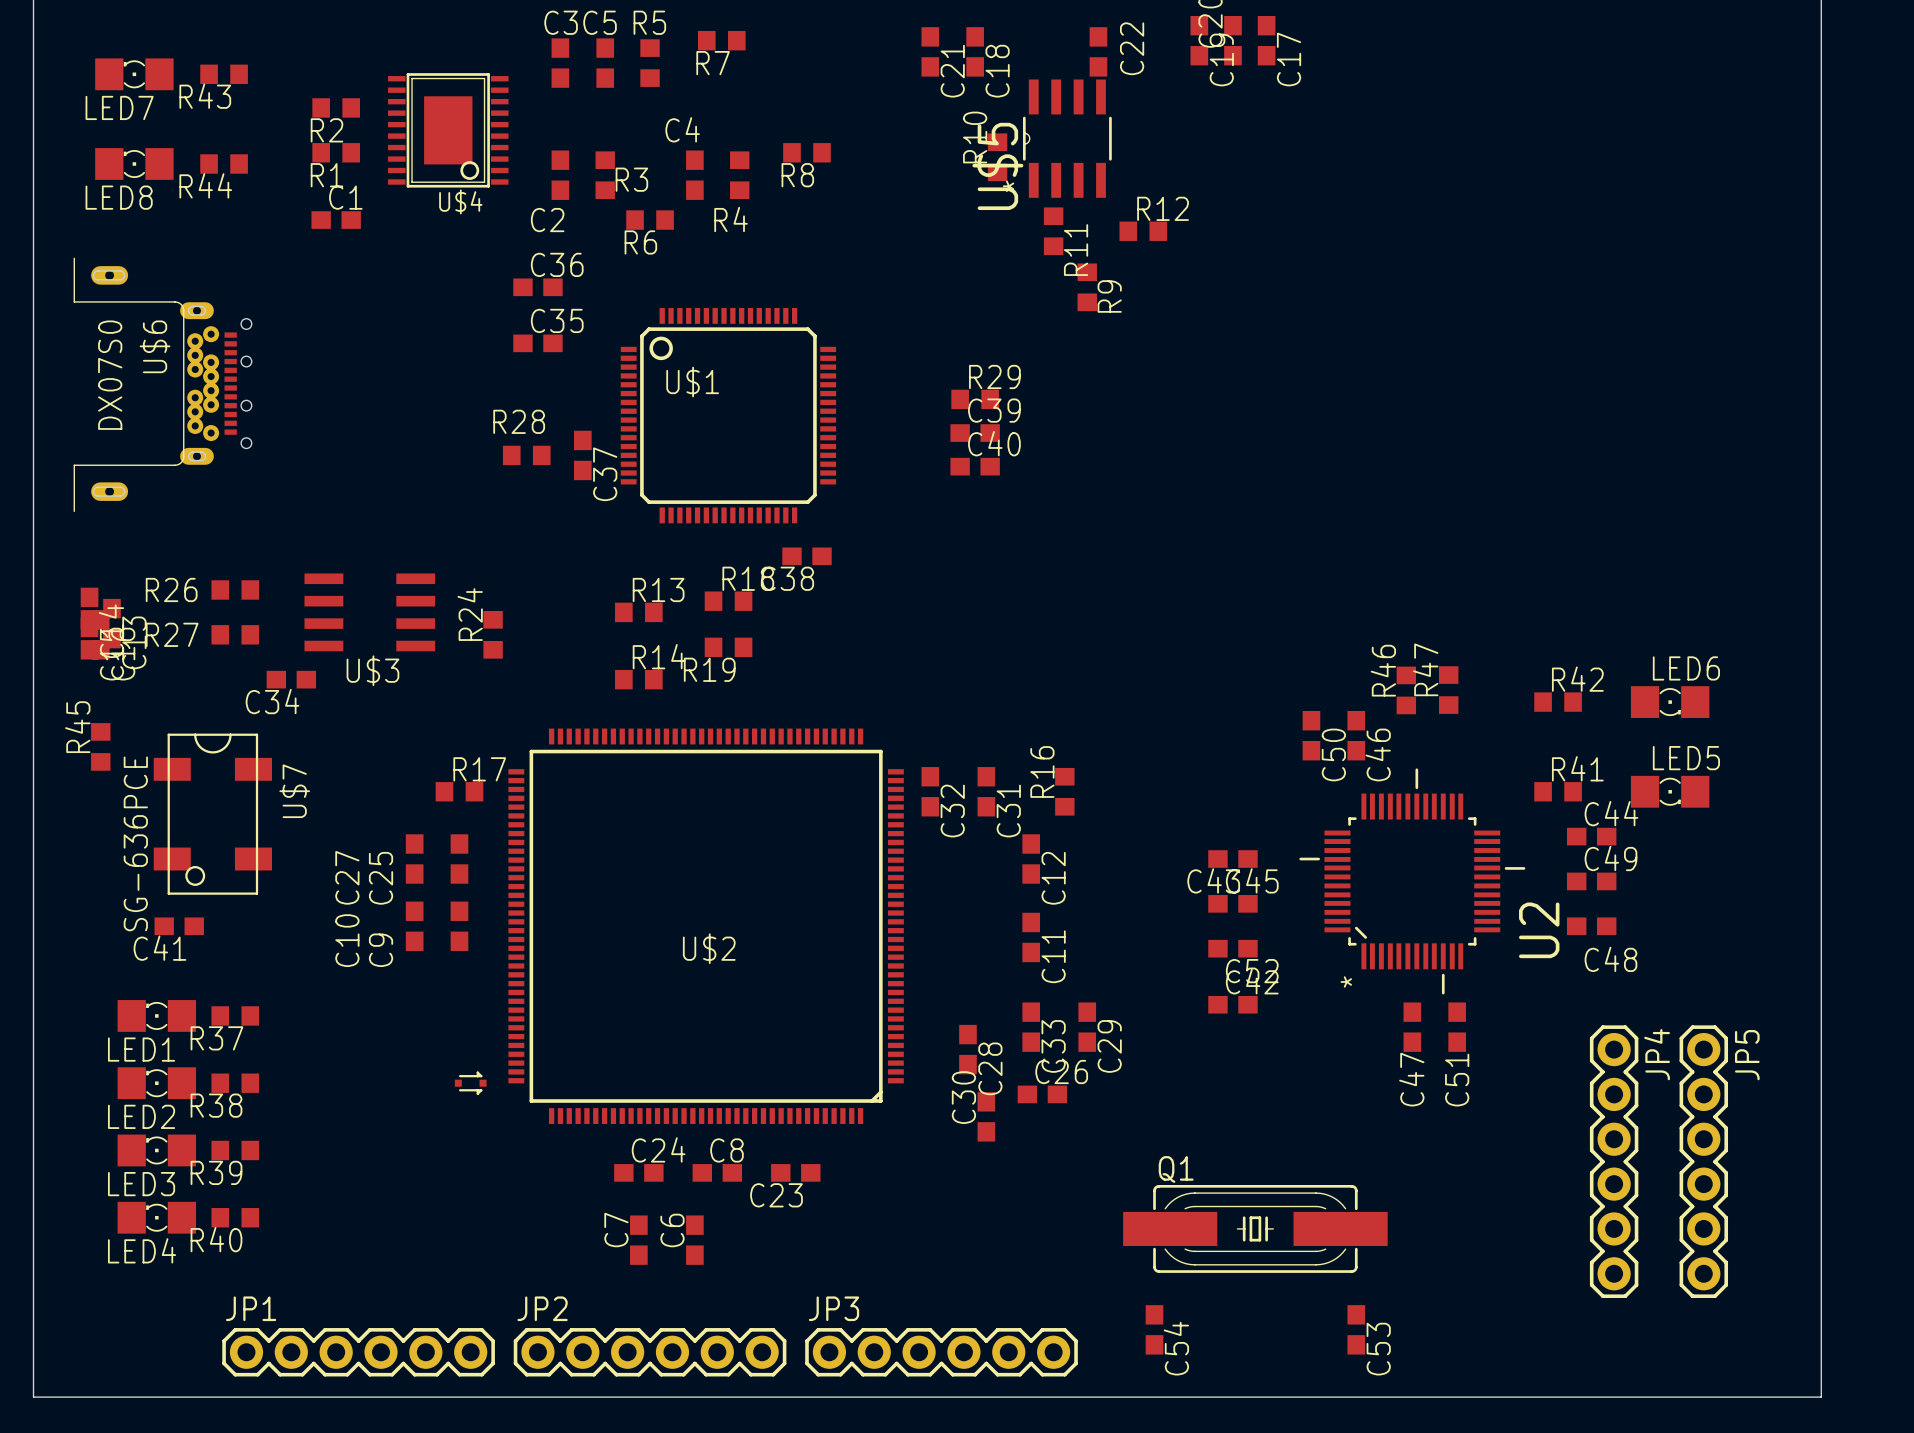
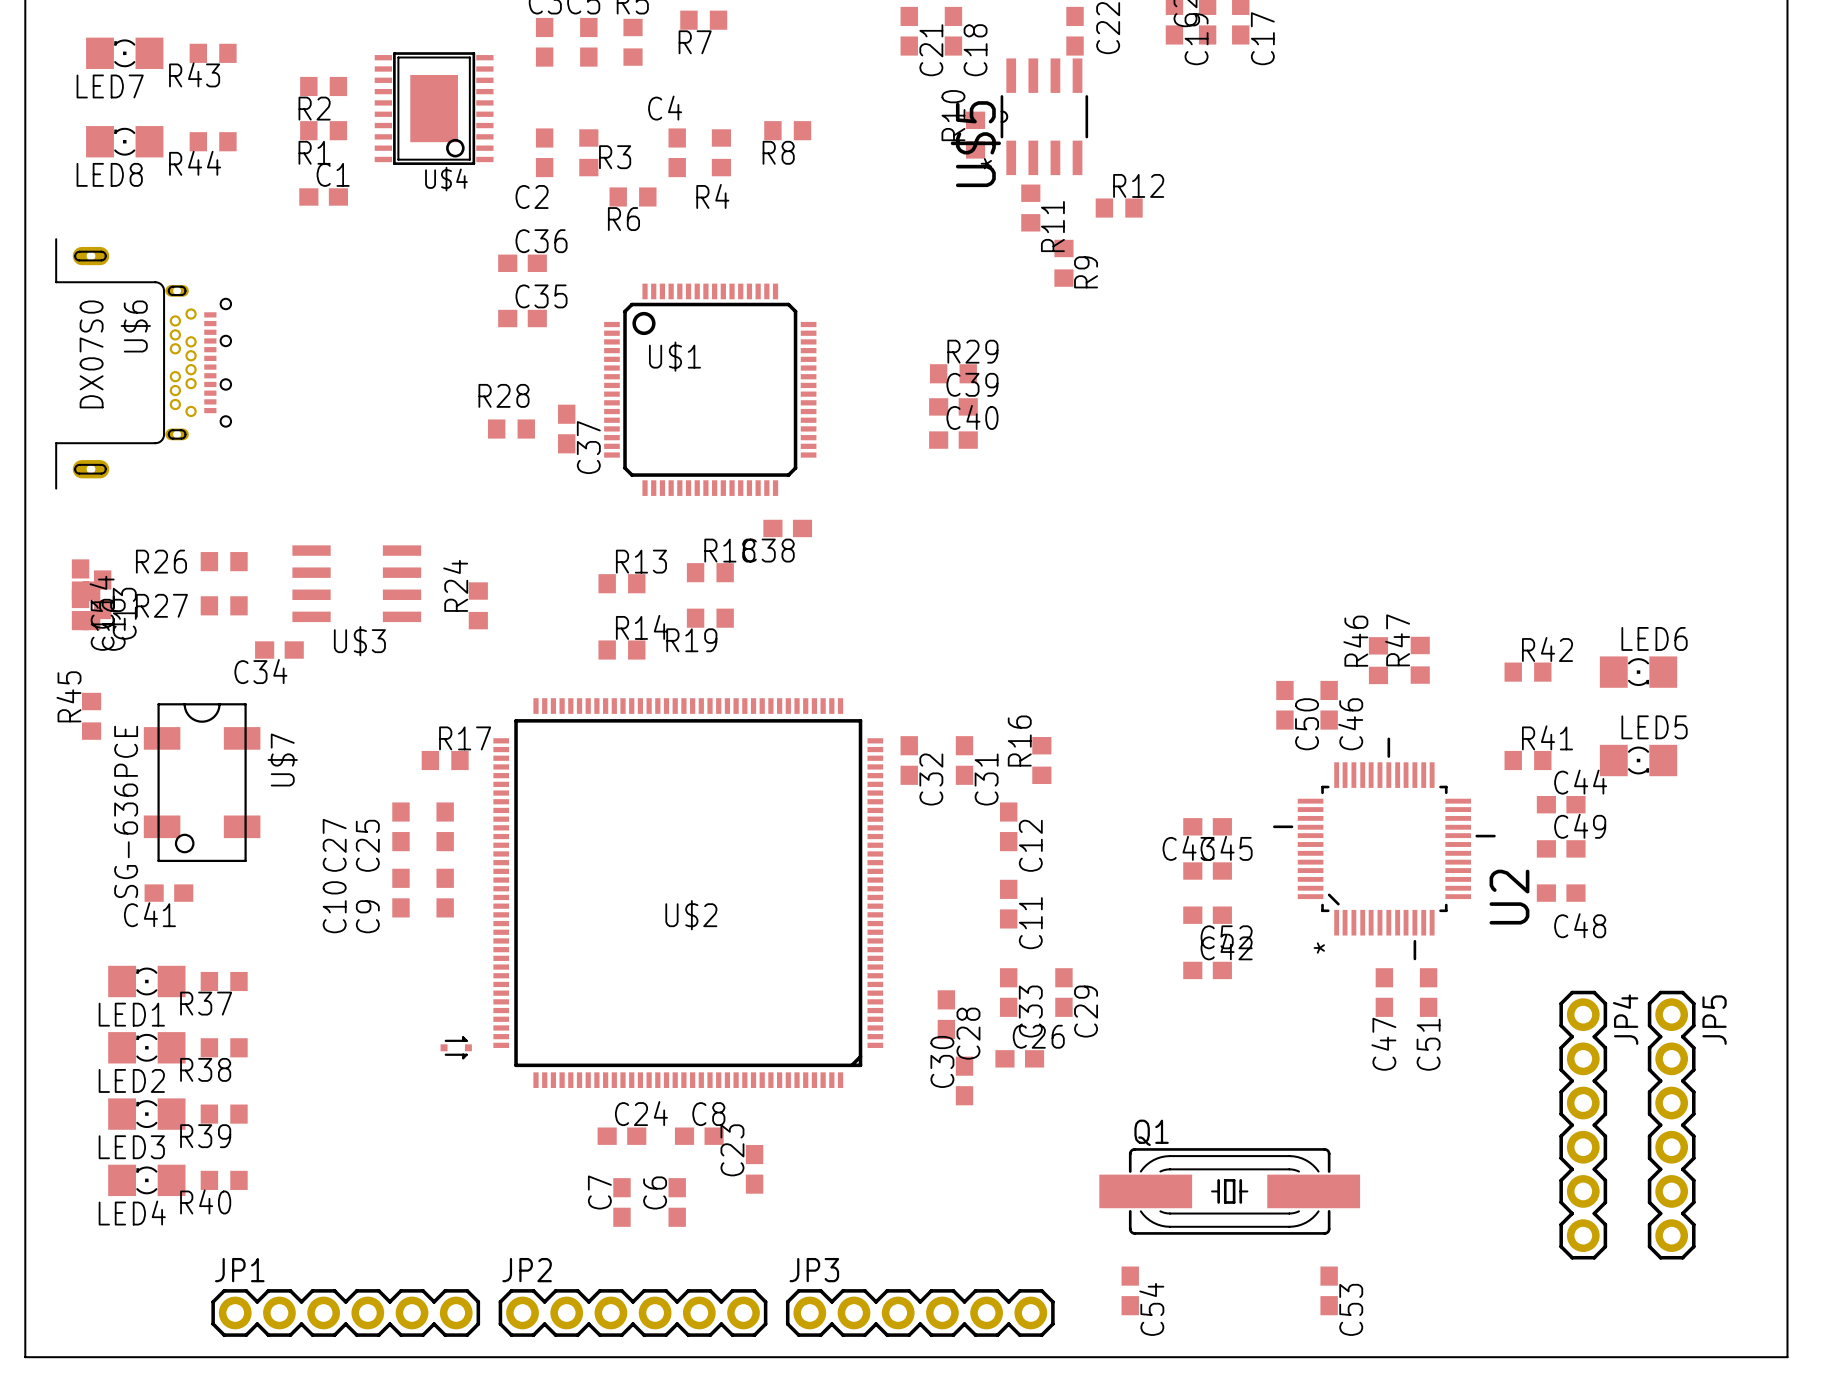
U$6 footprint: [74, 258, 252, 512] -> [55, 238, 232, 489]
C23 rotation: 0° (795, 1172) -> 90° clockwise (754, 1169)
C23 position: (795, 1172) -> (754, 1169)

